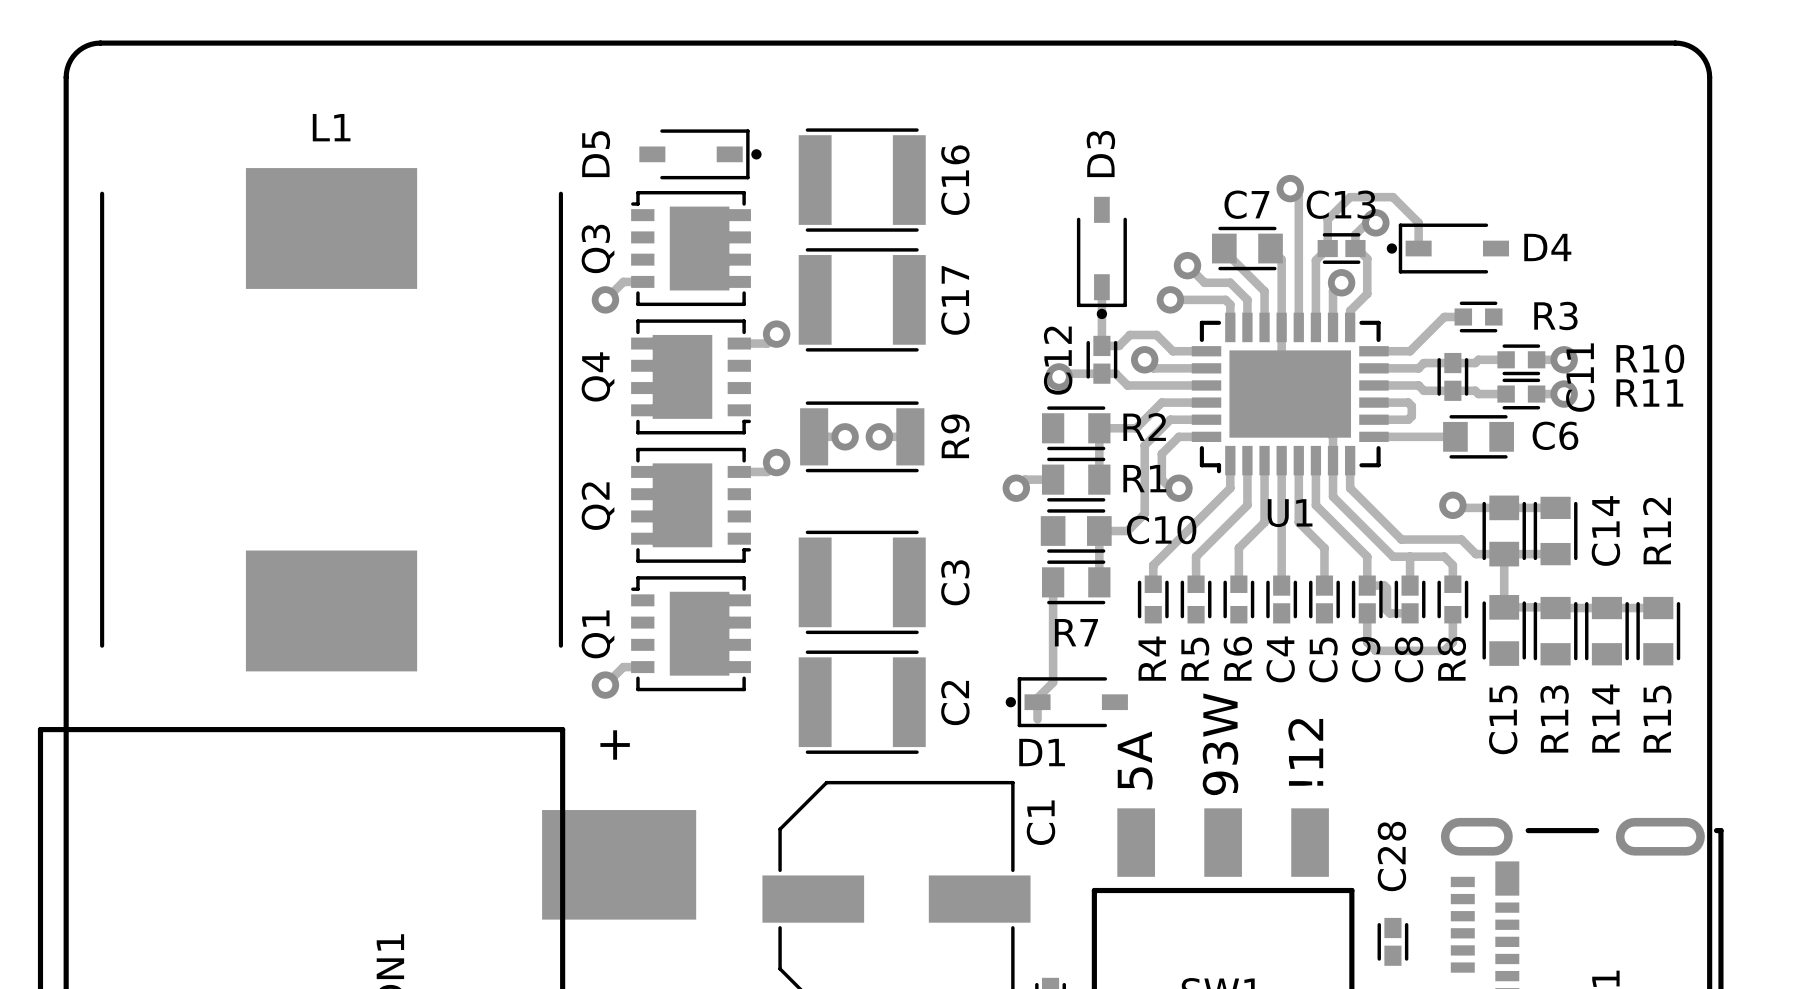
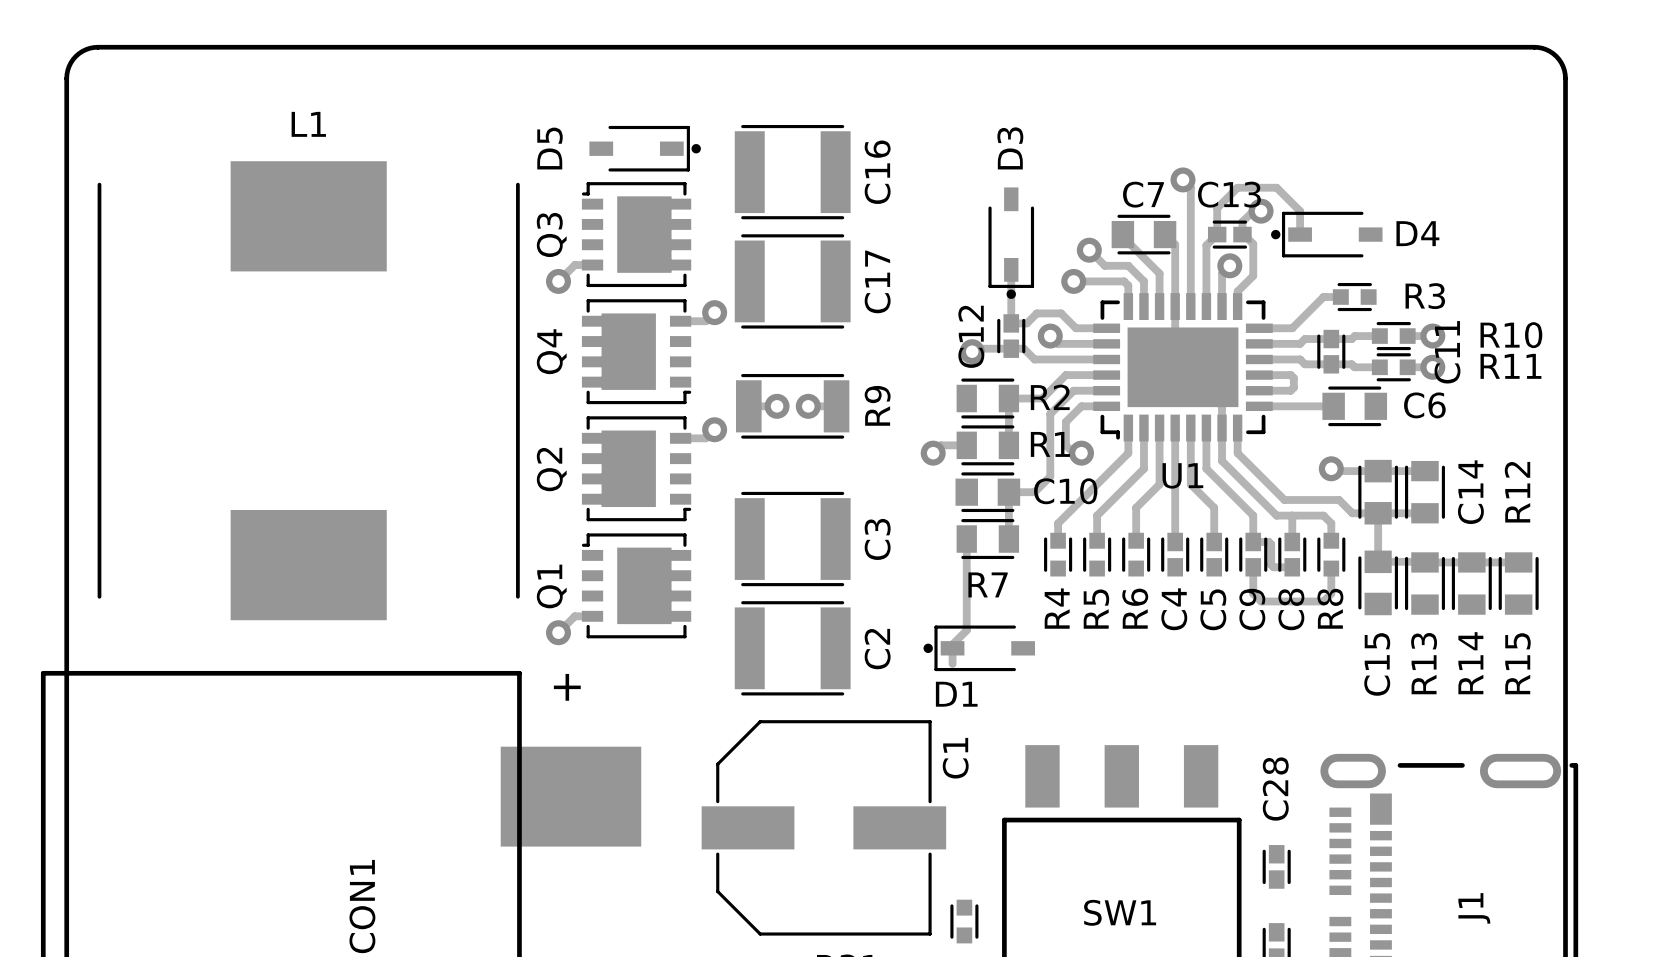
text: 93W (1220, 744) -> none
text: !12 (1305, 752) -> none
text: 5A (1135, 760) -> none

